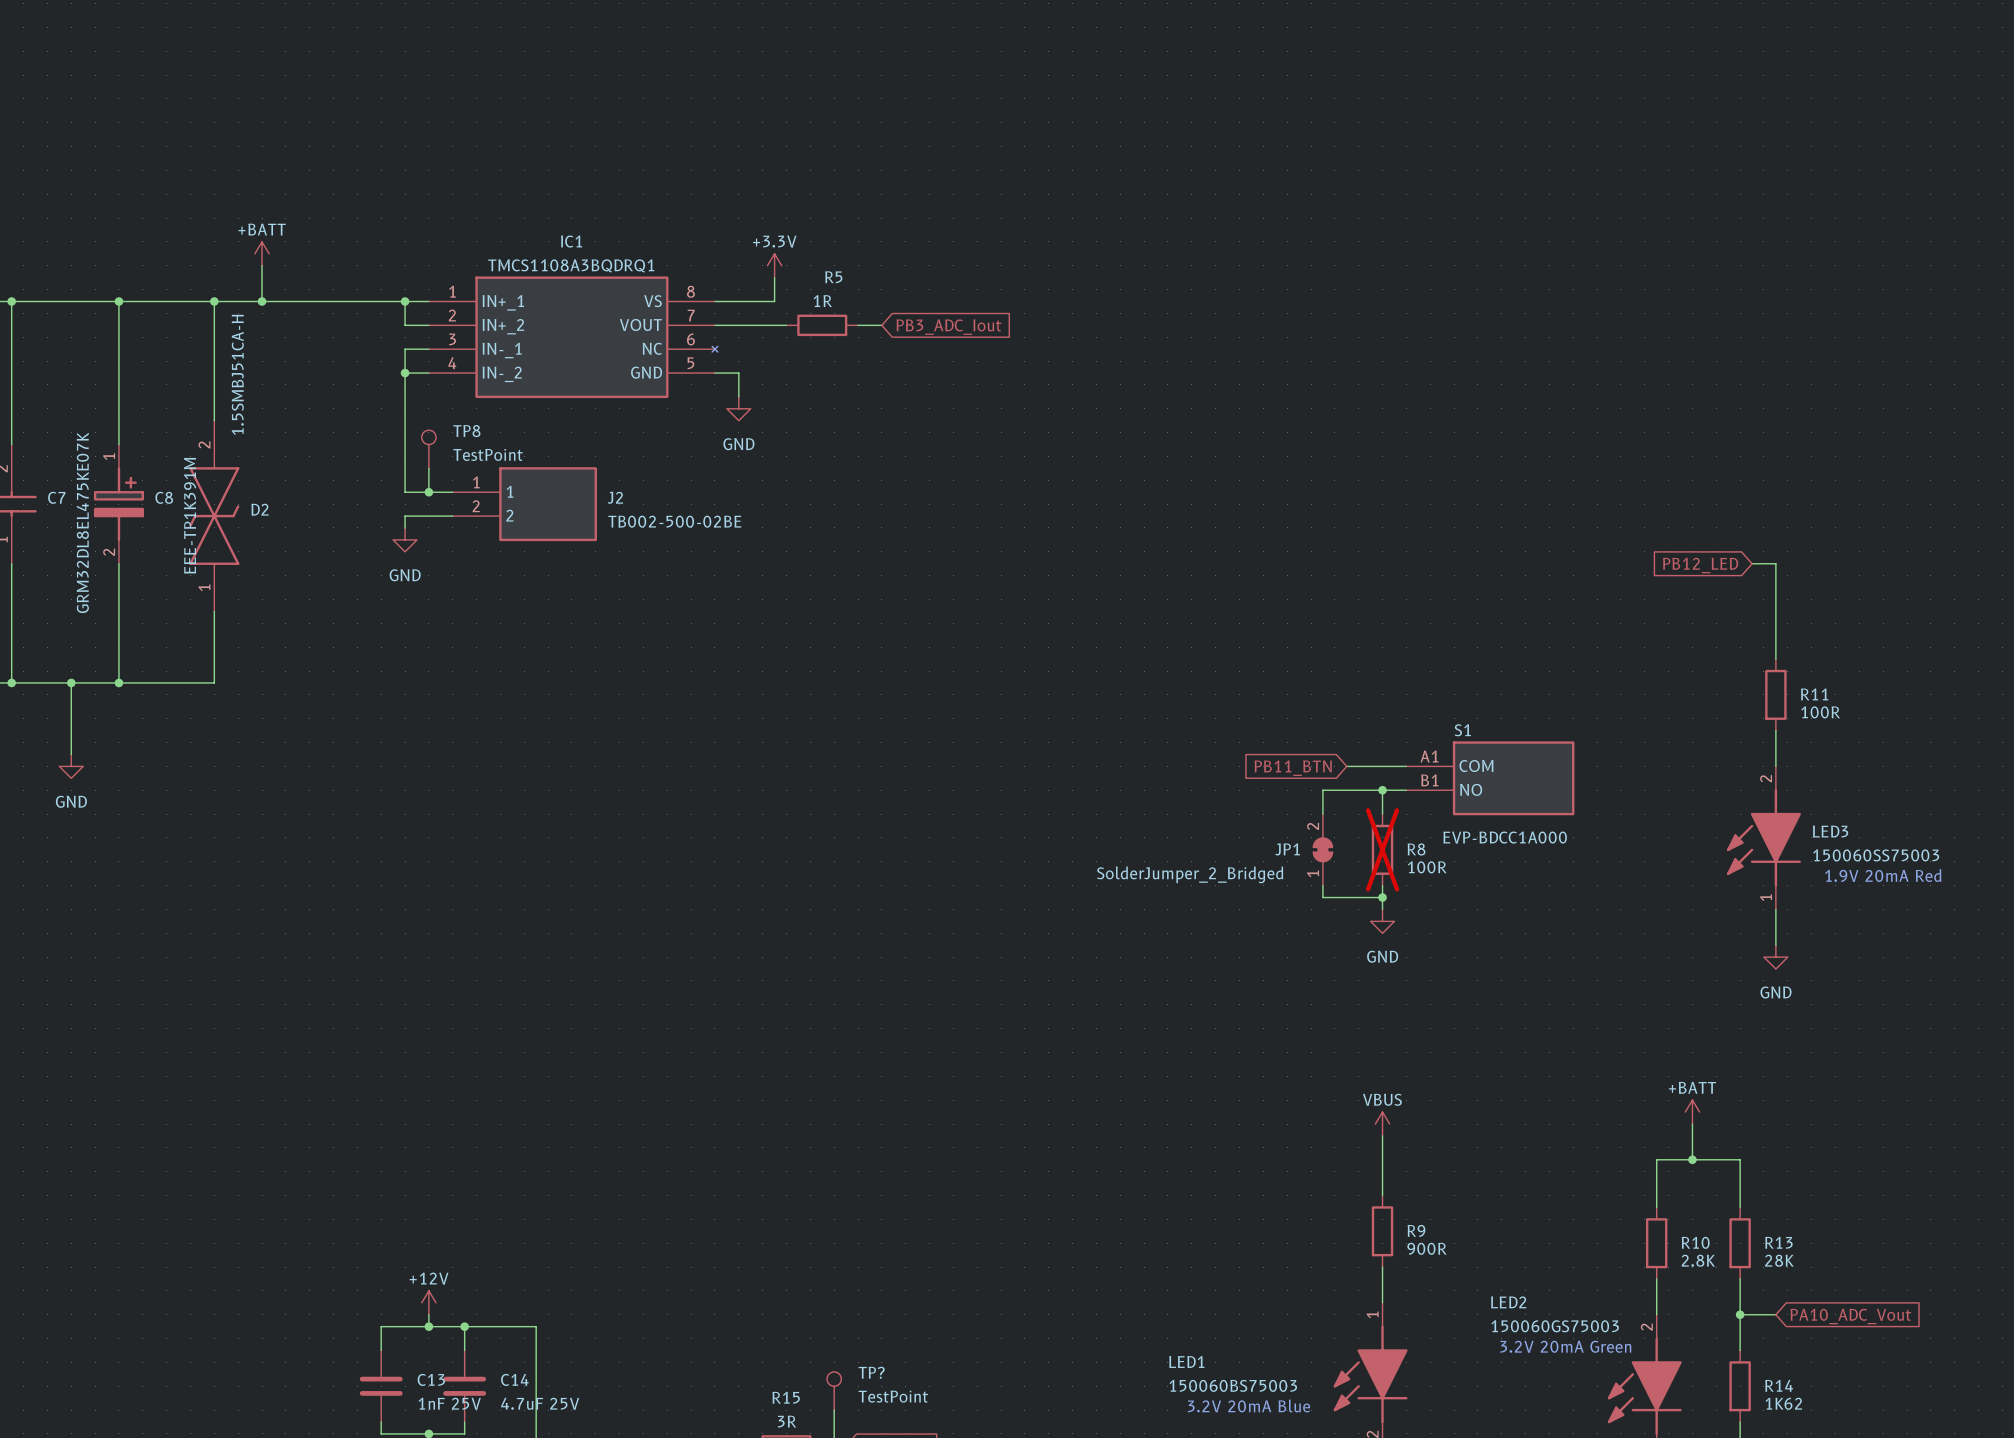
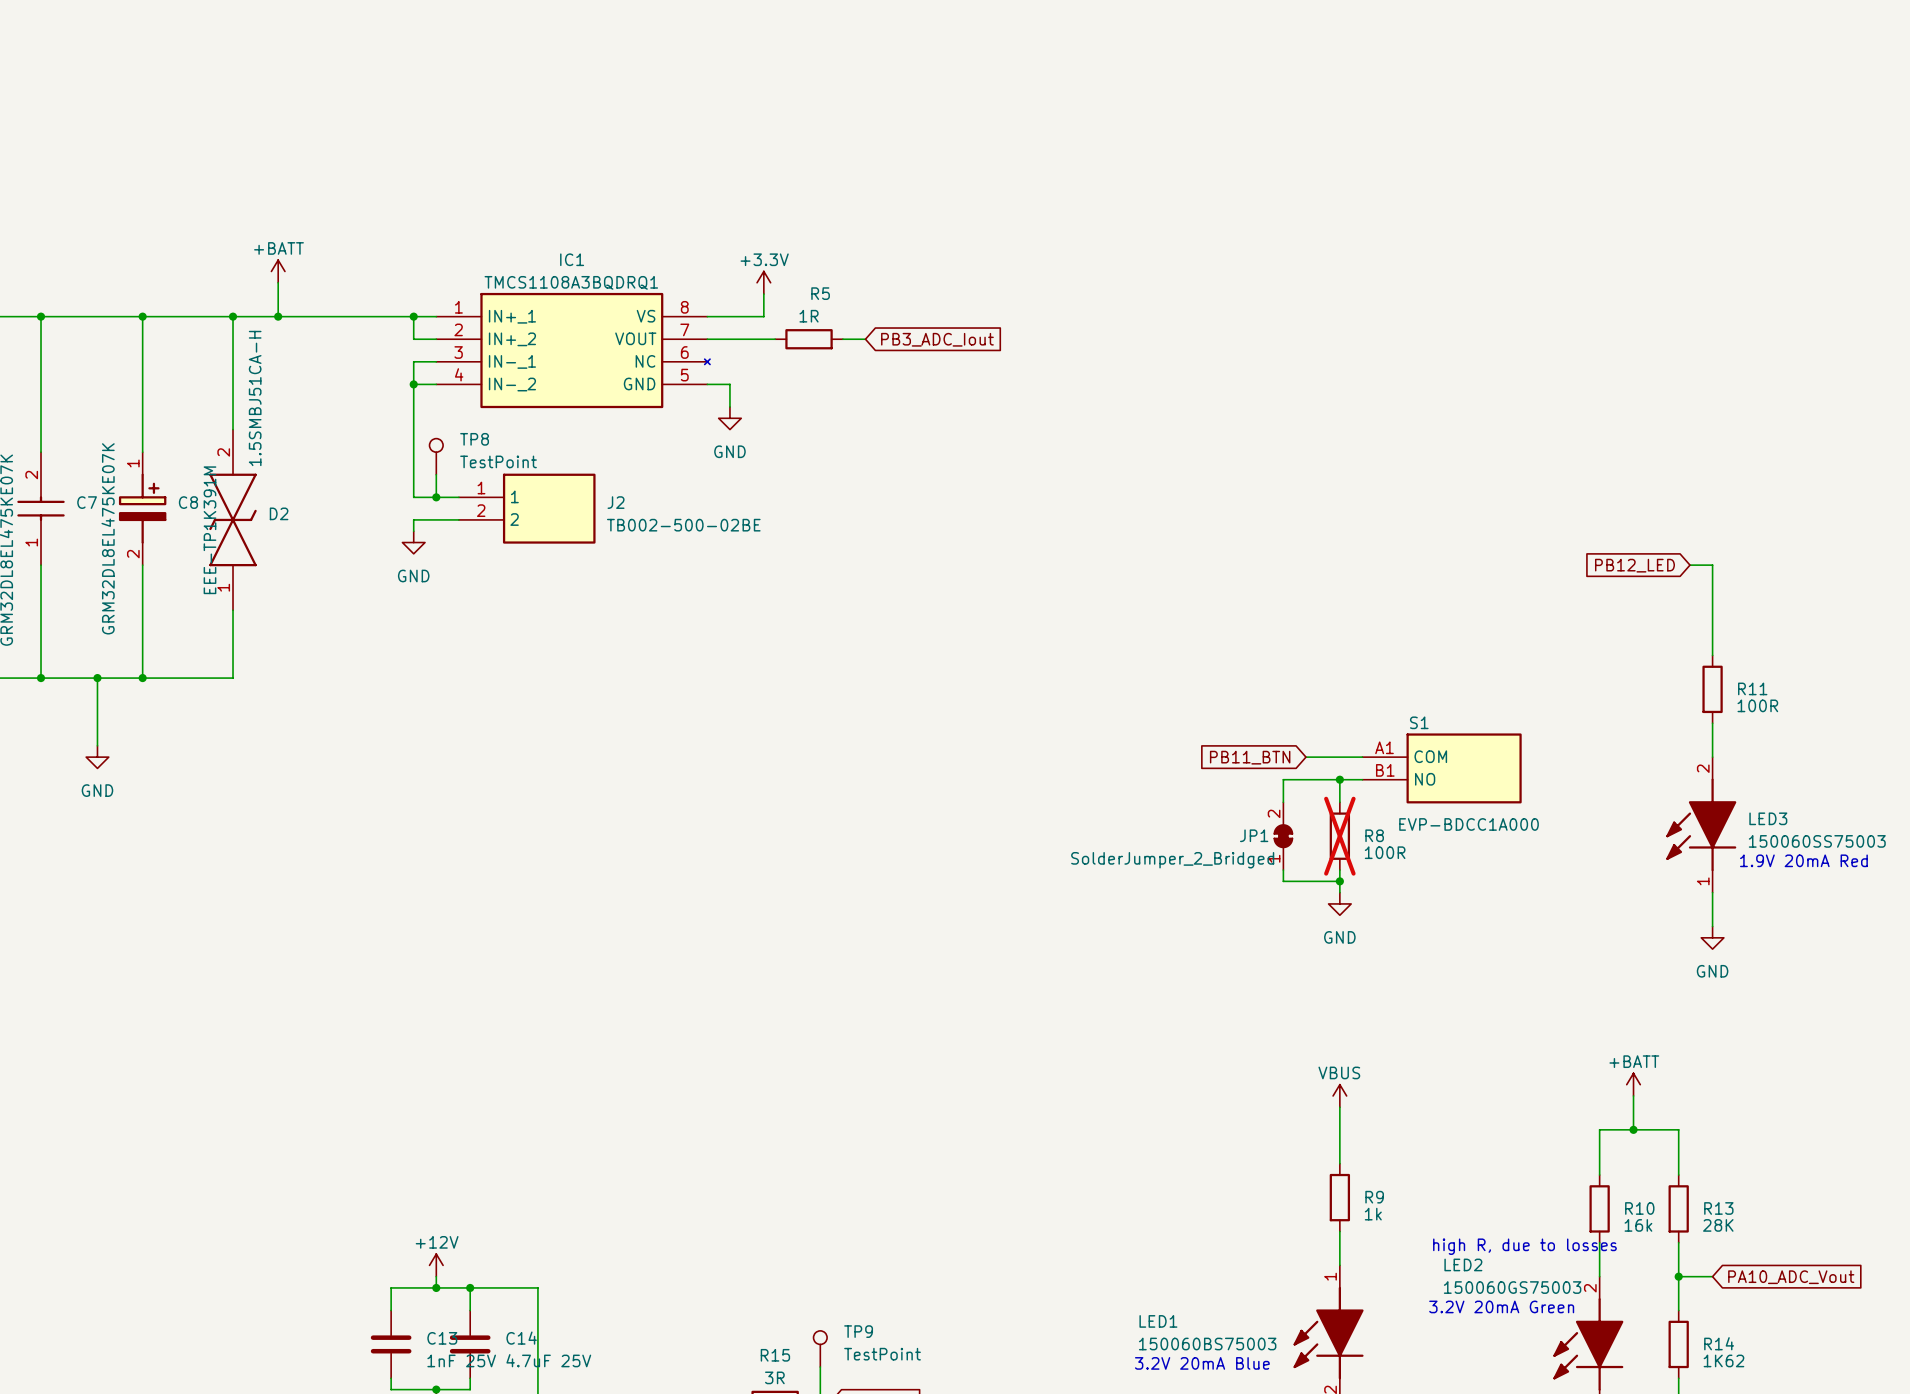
R9 value: 900R (1426, 1248) -> 1k (1373, 1214)
R10 value: 2.8K (1698, 1260) -> 16k (1638, 1225)
text: none -> high R, due to losses (1524, 1246)
TP? name: TP? (871, 1372) -> TP9 (858, 1331)

